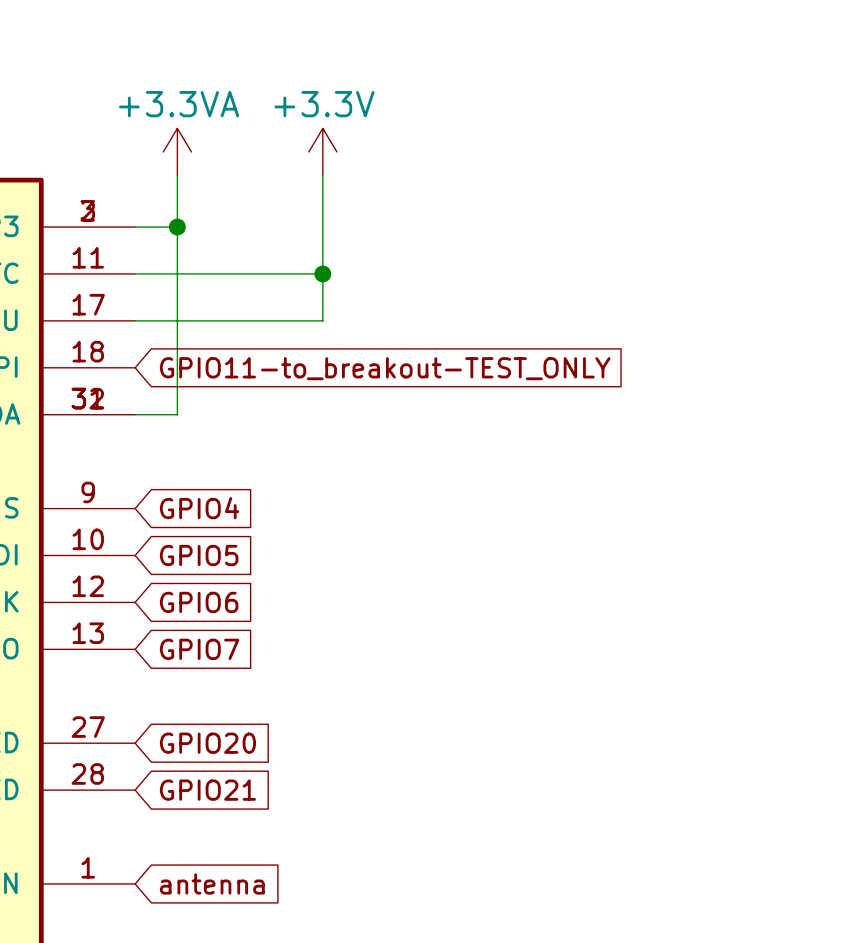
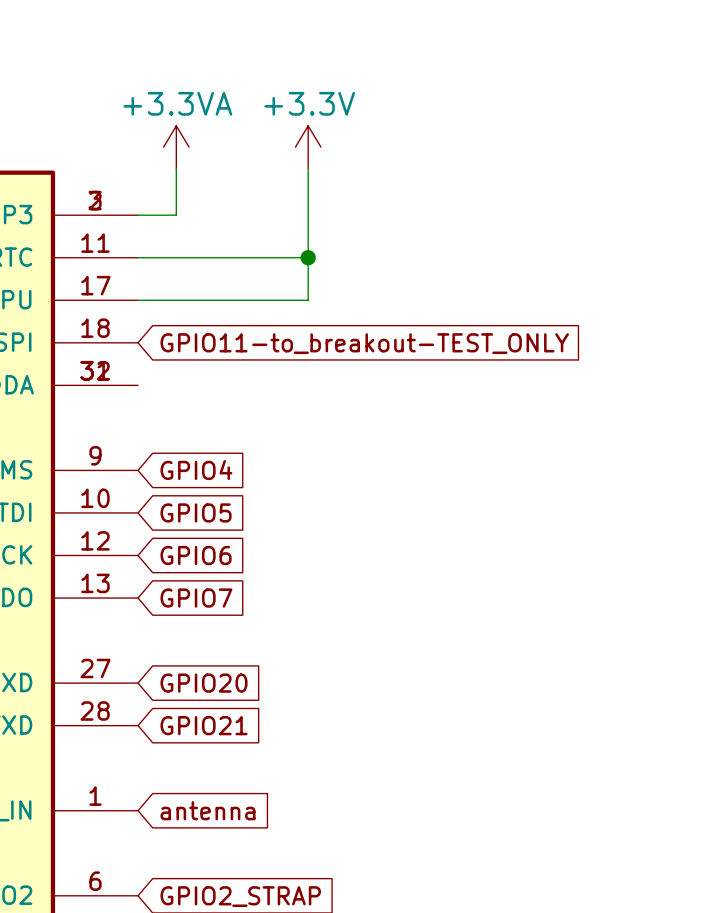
wire: (177, 227) (177, 414) (135, 414) -> none
junction: (177, 227) -> none

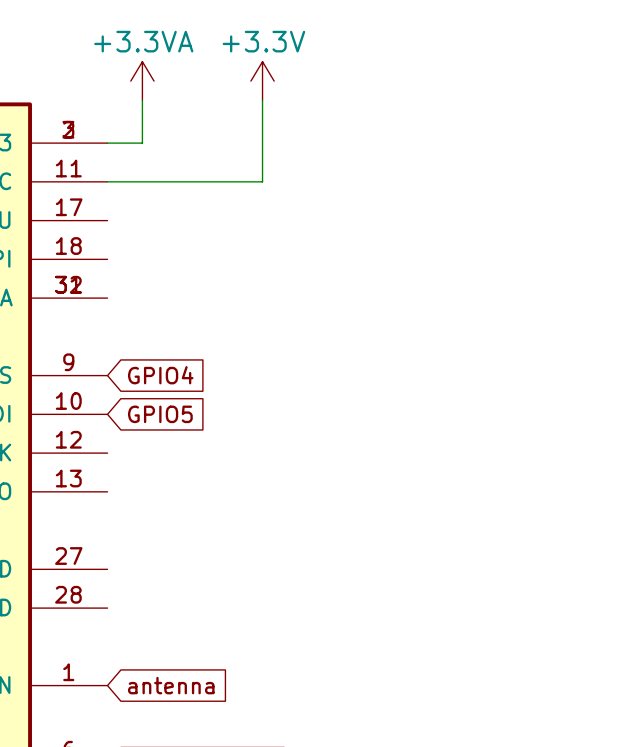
wire: (308, 257) (308, 300) (138, 300) -> none
junction: (308, 257) -> none
global label: GPIO11-to_breakout-TEST_ONLY (364, 343) -> none
global label: GPIO6 (196, 555) -> none
global label: GPIO7 (196, 598) -> none
global label: GPIO20 (204, 683) -> none
global label: GPIO21 (204, 725) -> none

